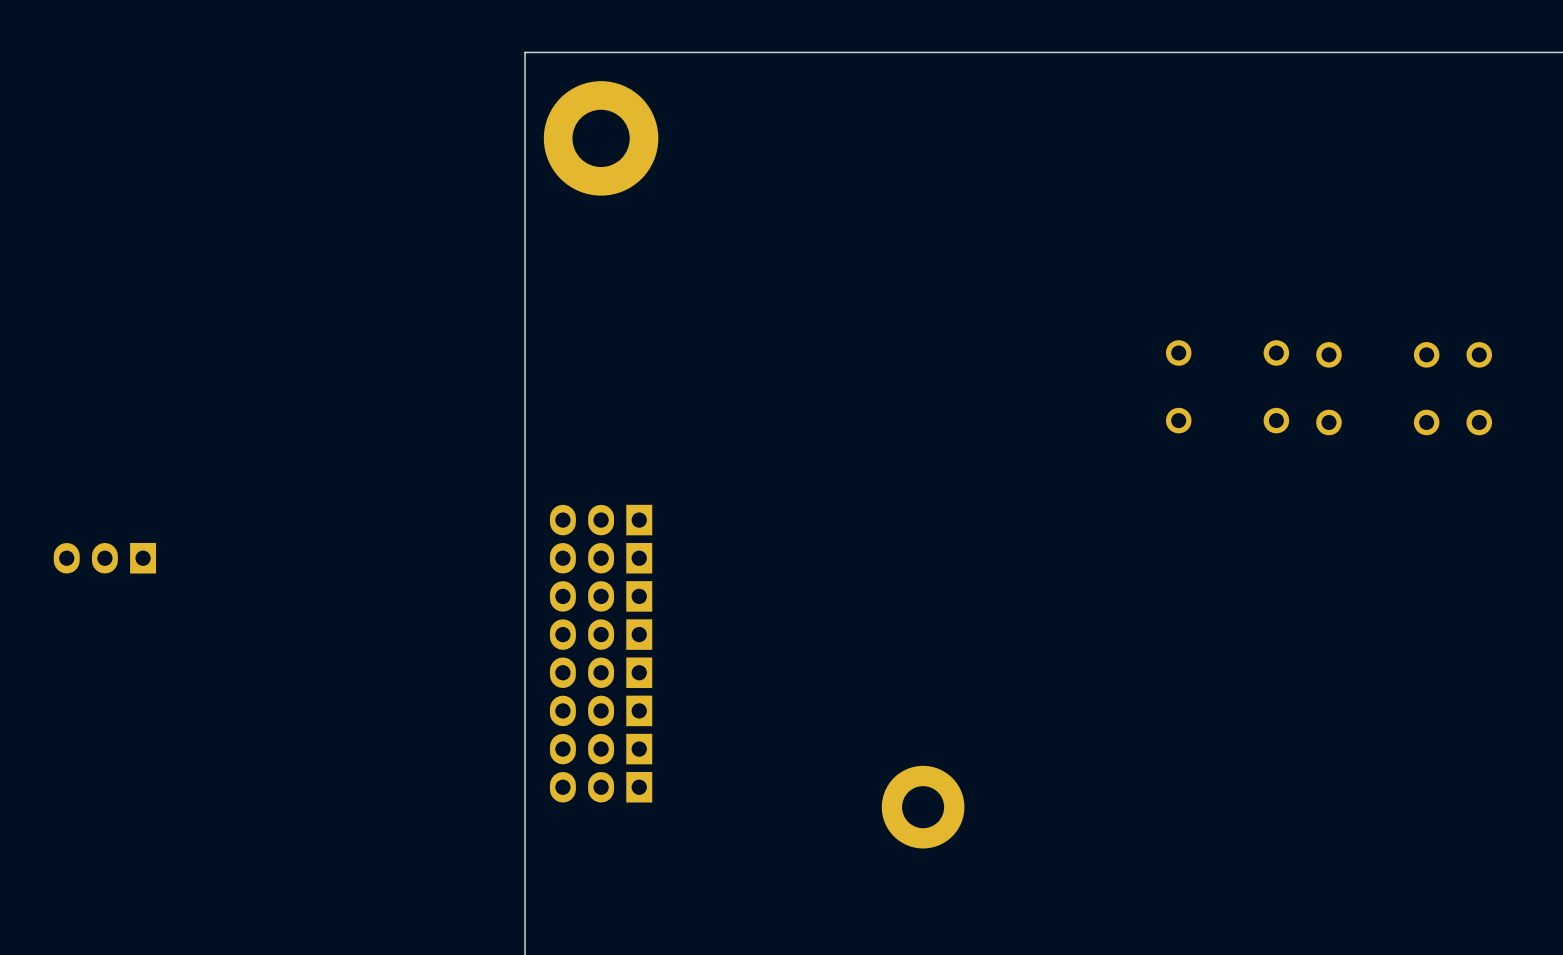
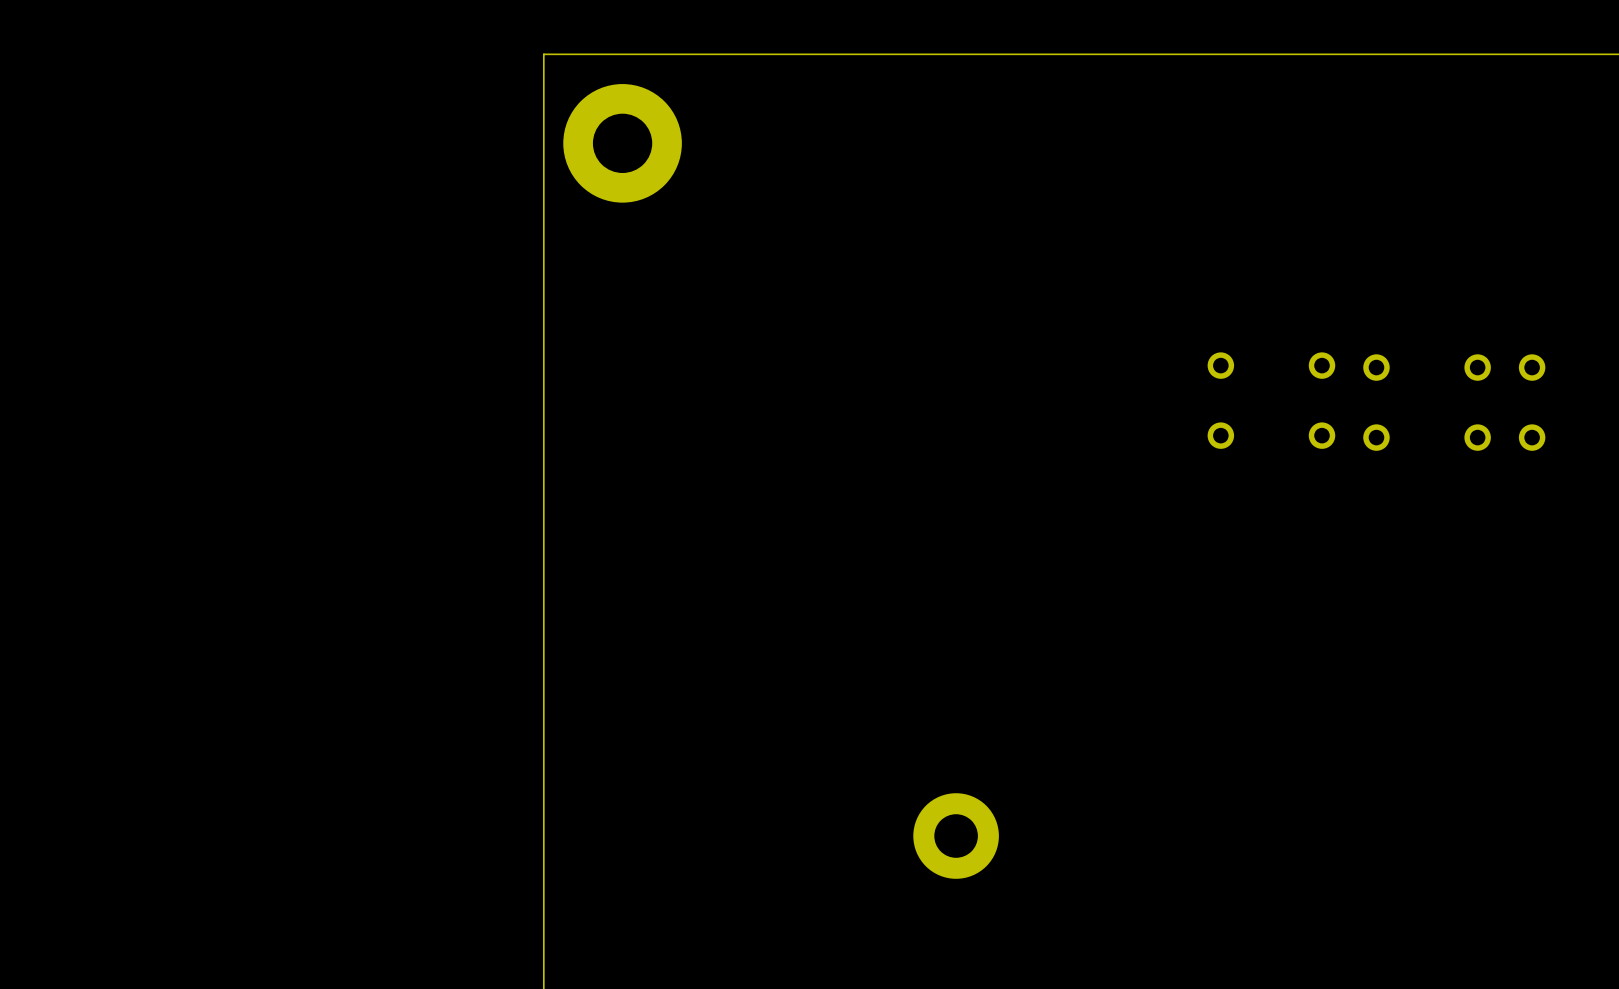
part: (601, 520) -> none
part: (104, 558) -> none
part: (601, 558) -> none
part: (601, 596) -> none
part: (601, 634) -> none
part: (601, 672) -> none
part: (601, 710) -> none
part: (601, 749) -> none
part: (601, 787) -> none

